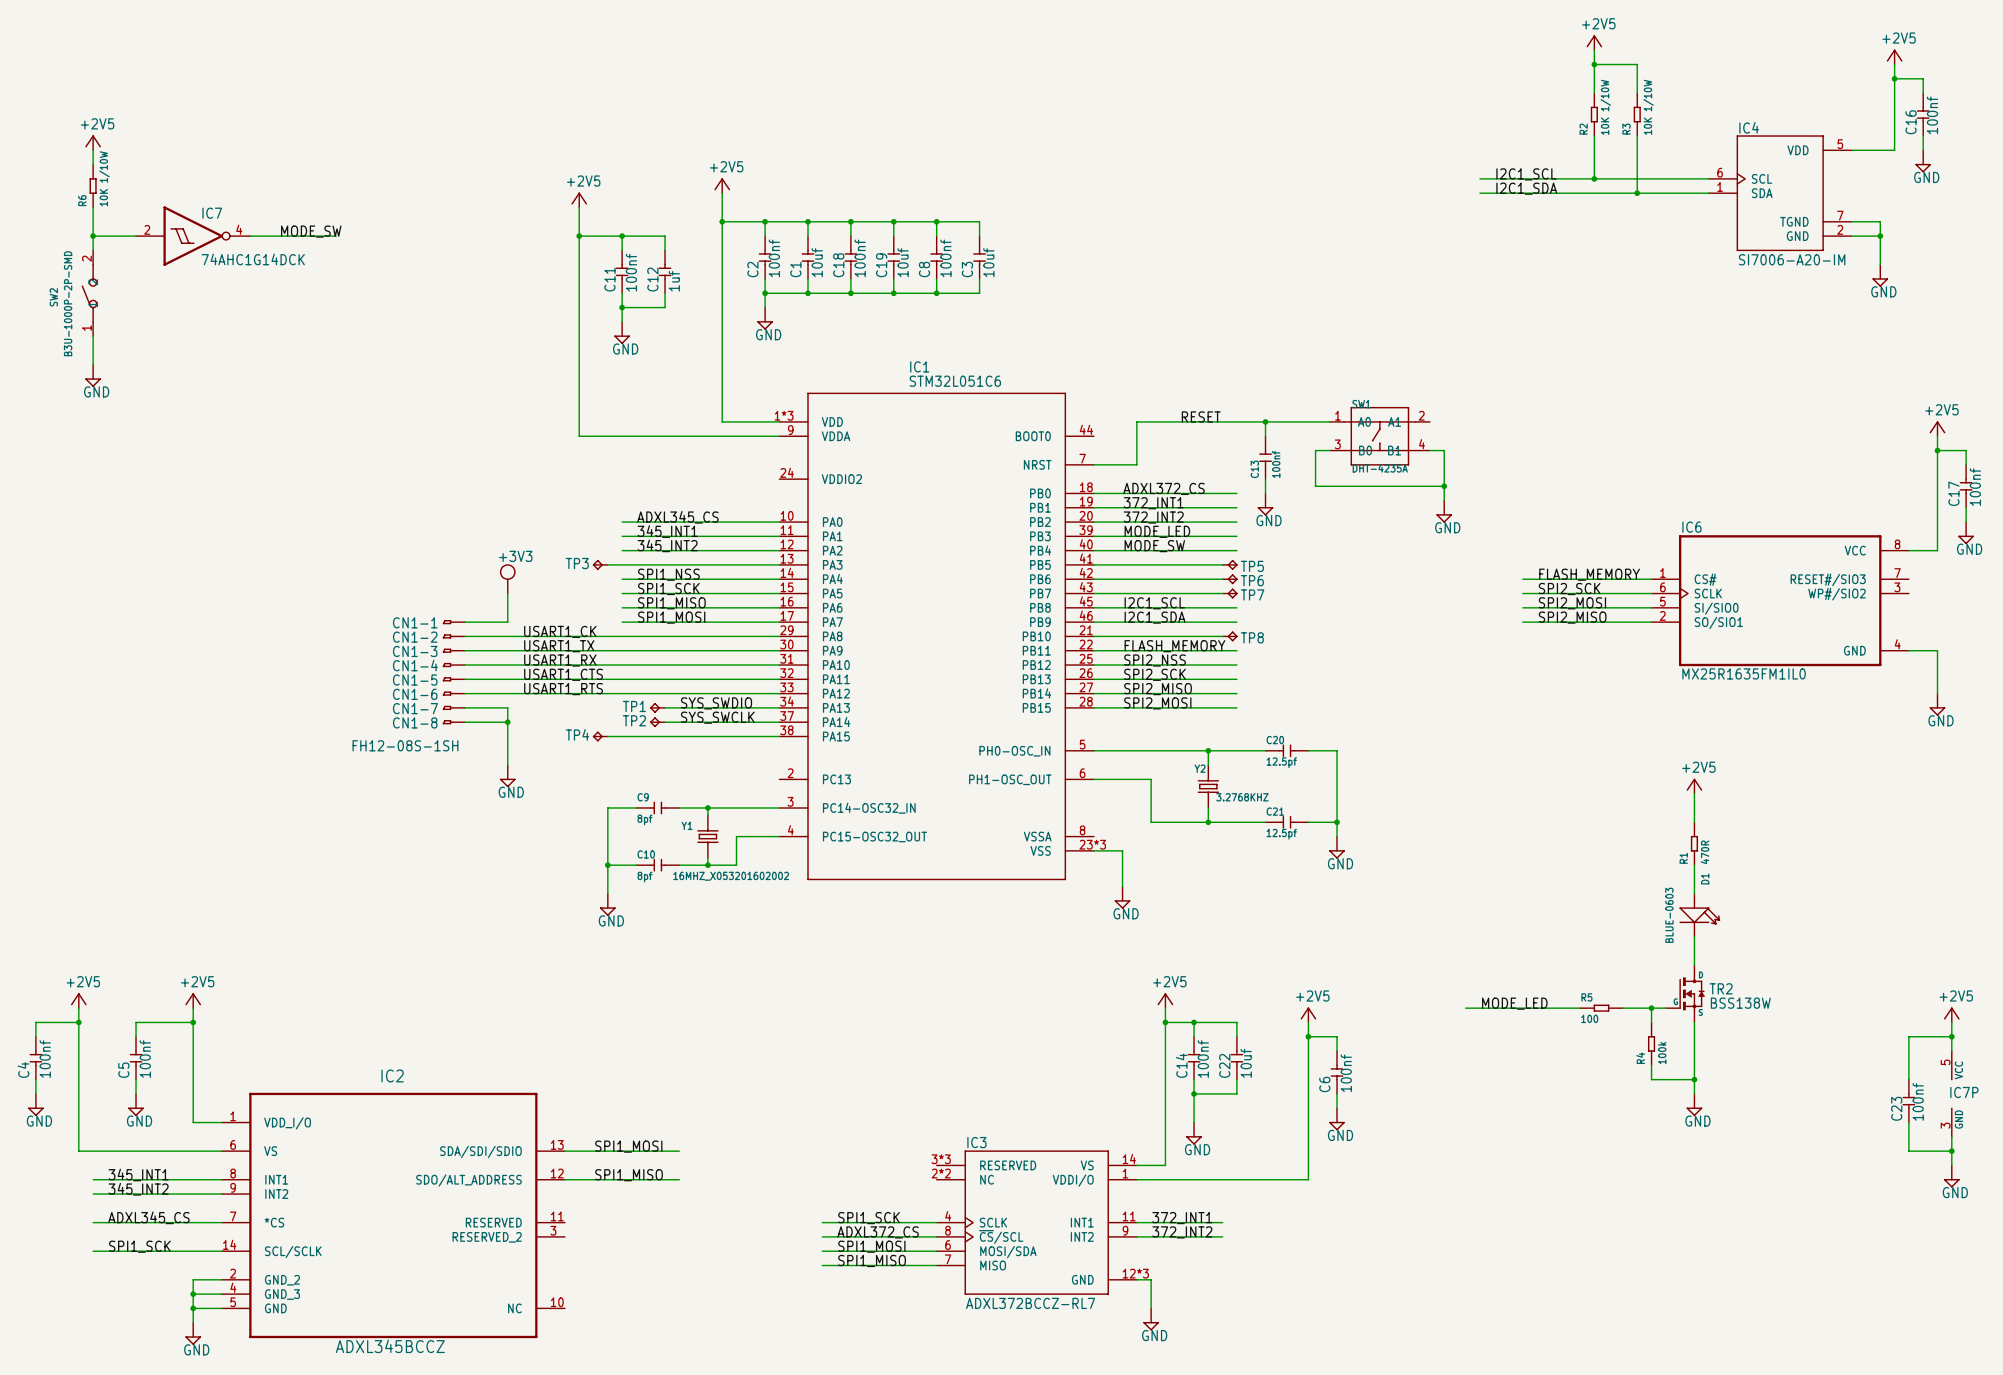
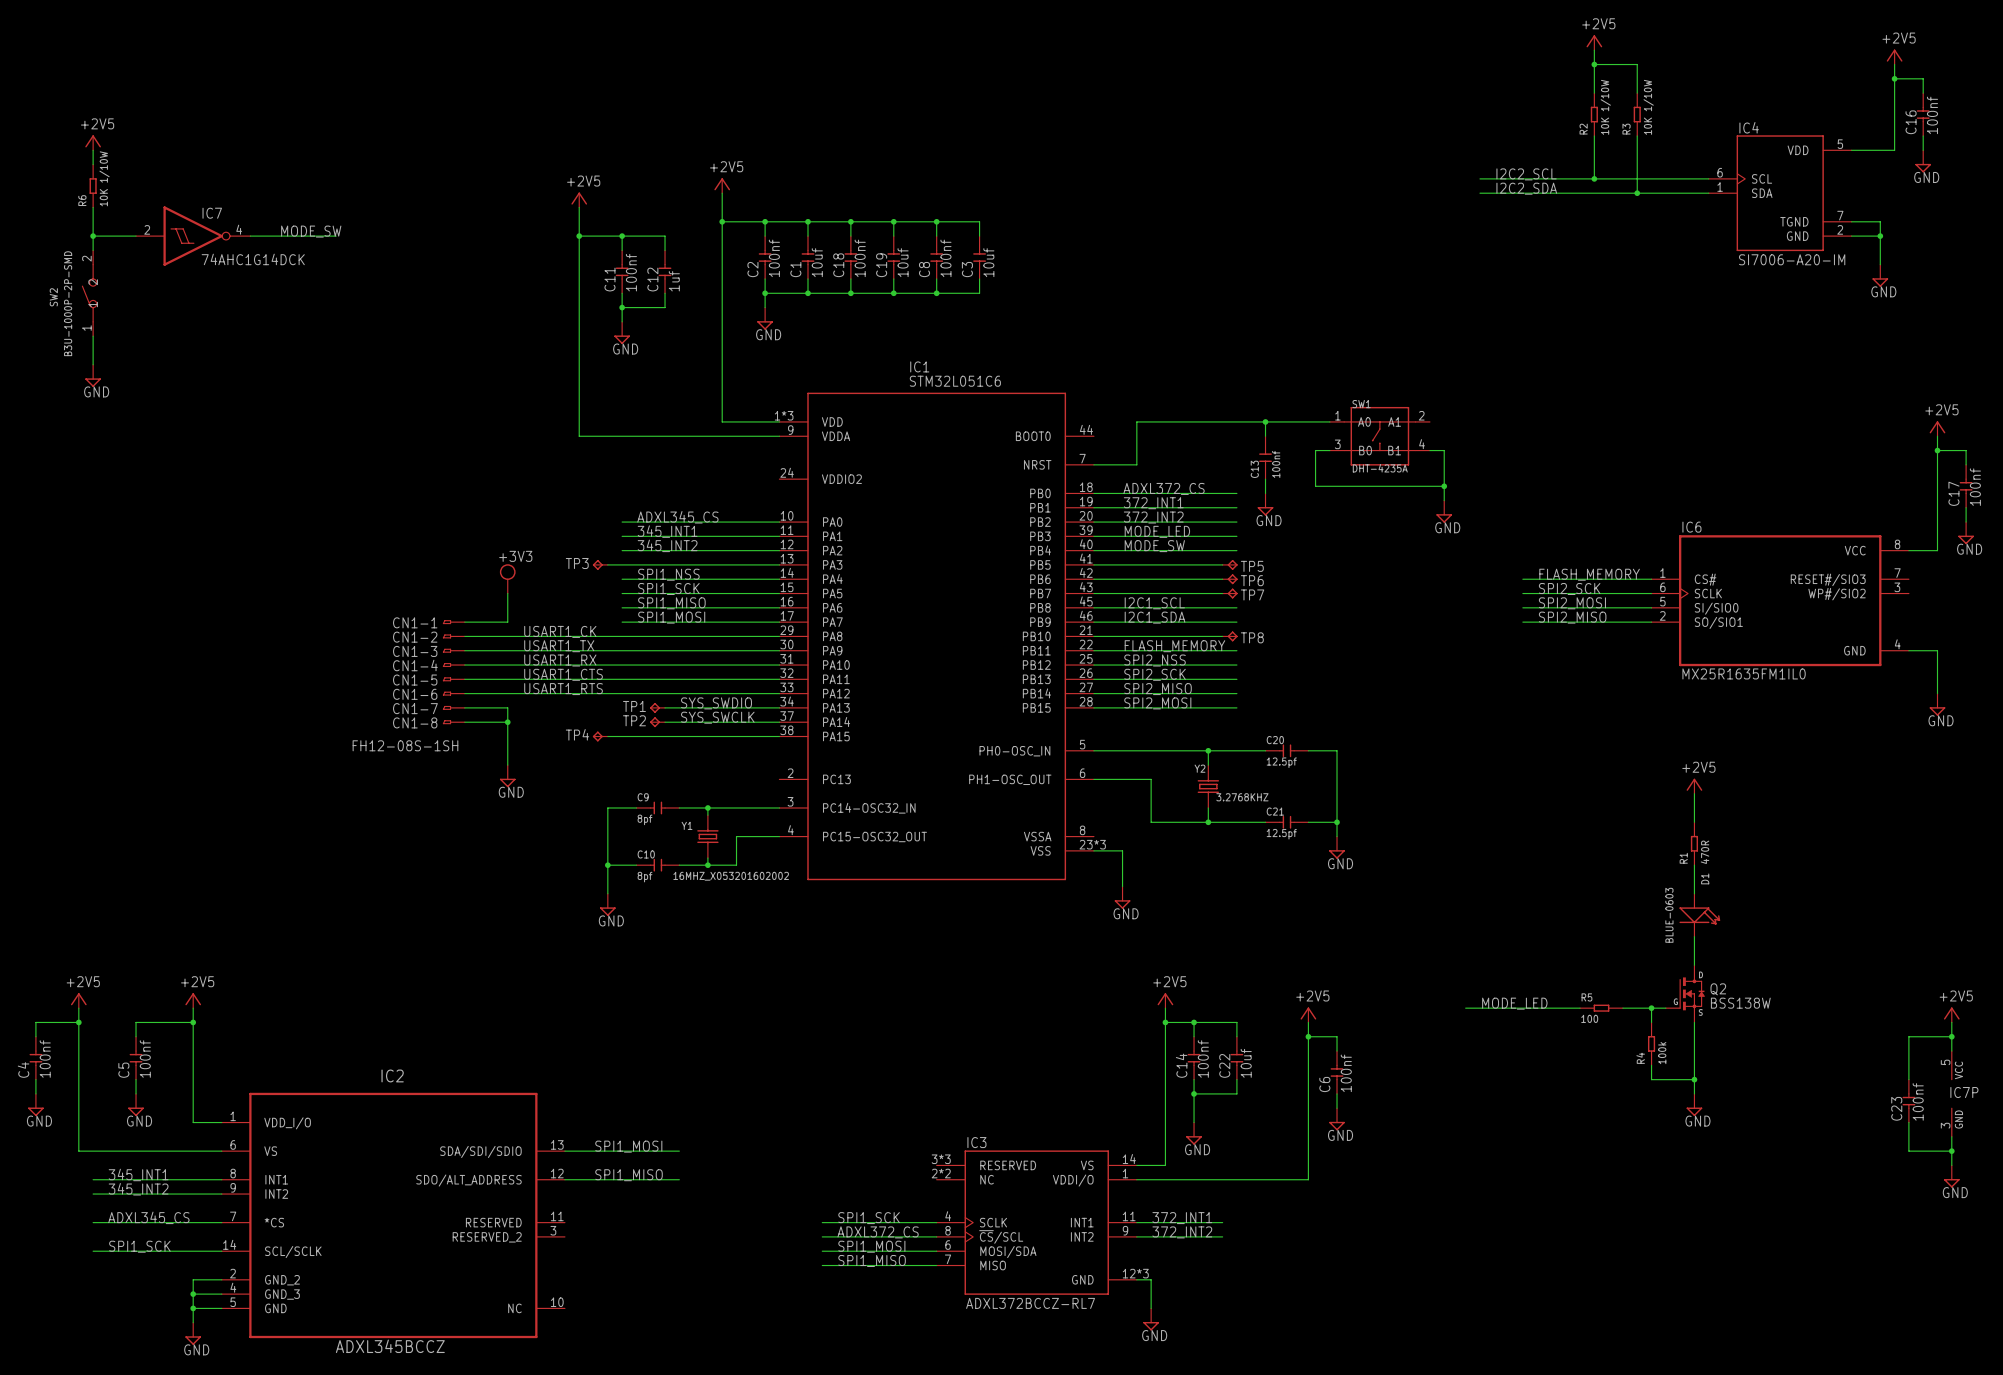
label: I2C1_SCL (1526, 174) -> I2C2_SCL (1526, 174)
label: I2C1_SDA (1526, 188) -> I2C2_SDA (1526, 188)
label: RESET (1201, 416) -> none
TR2 name: TR2 (1721, 988) -> Q2 (1718, 989)

